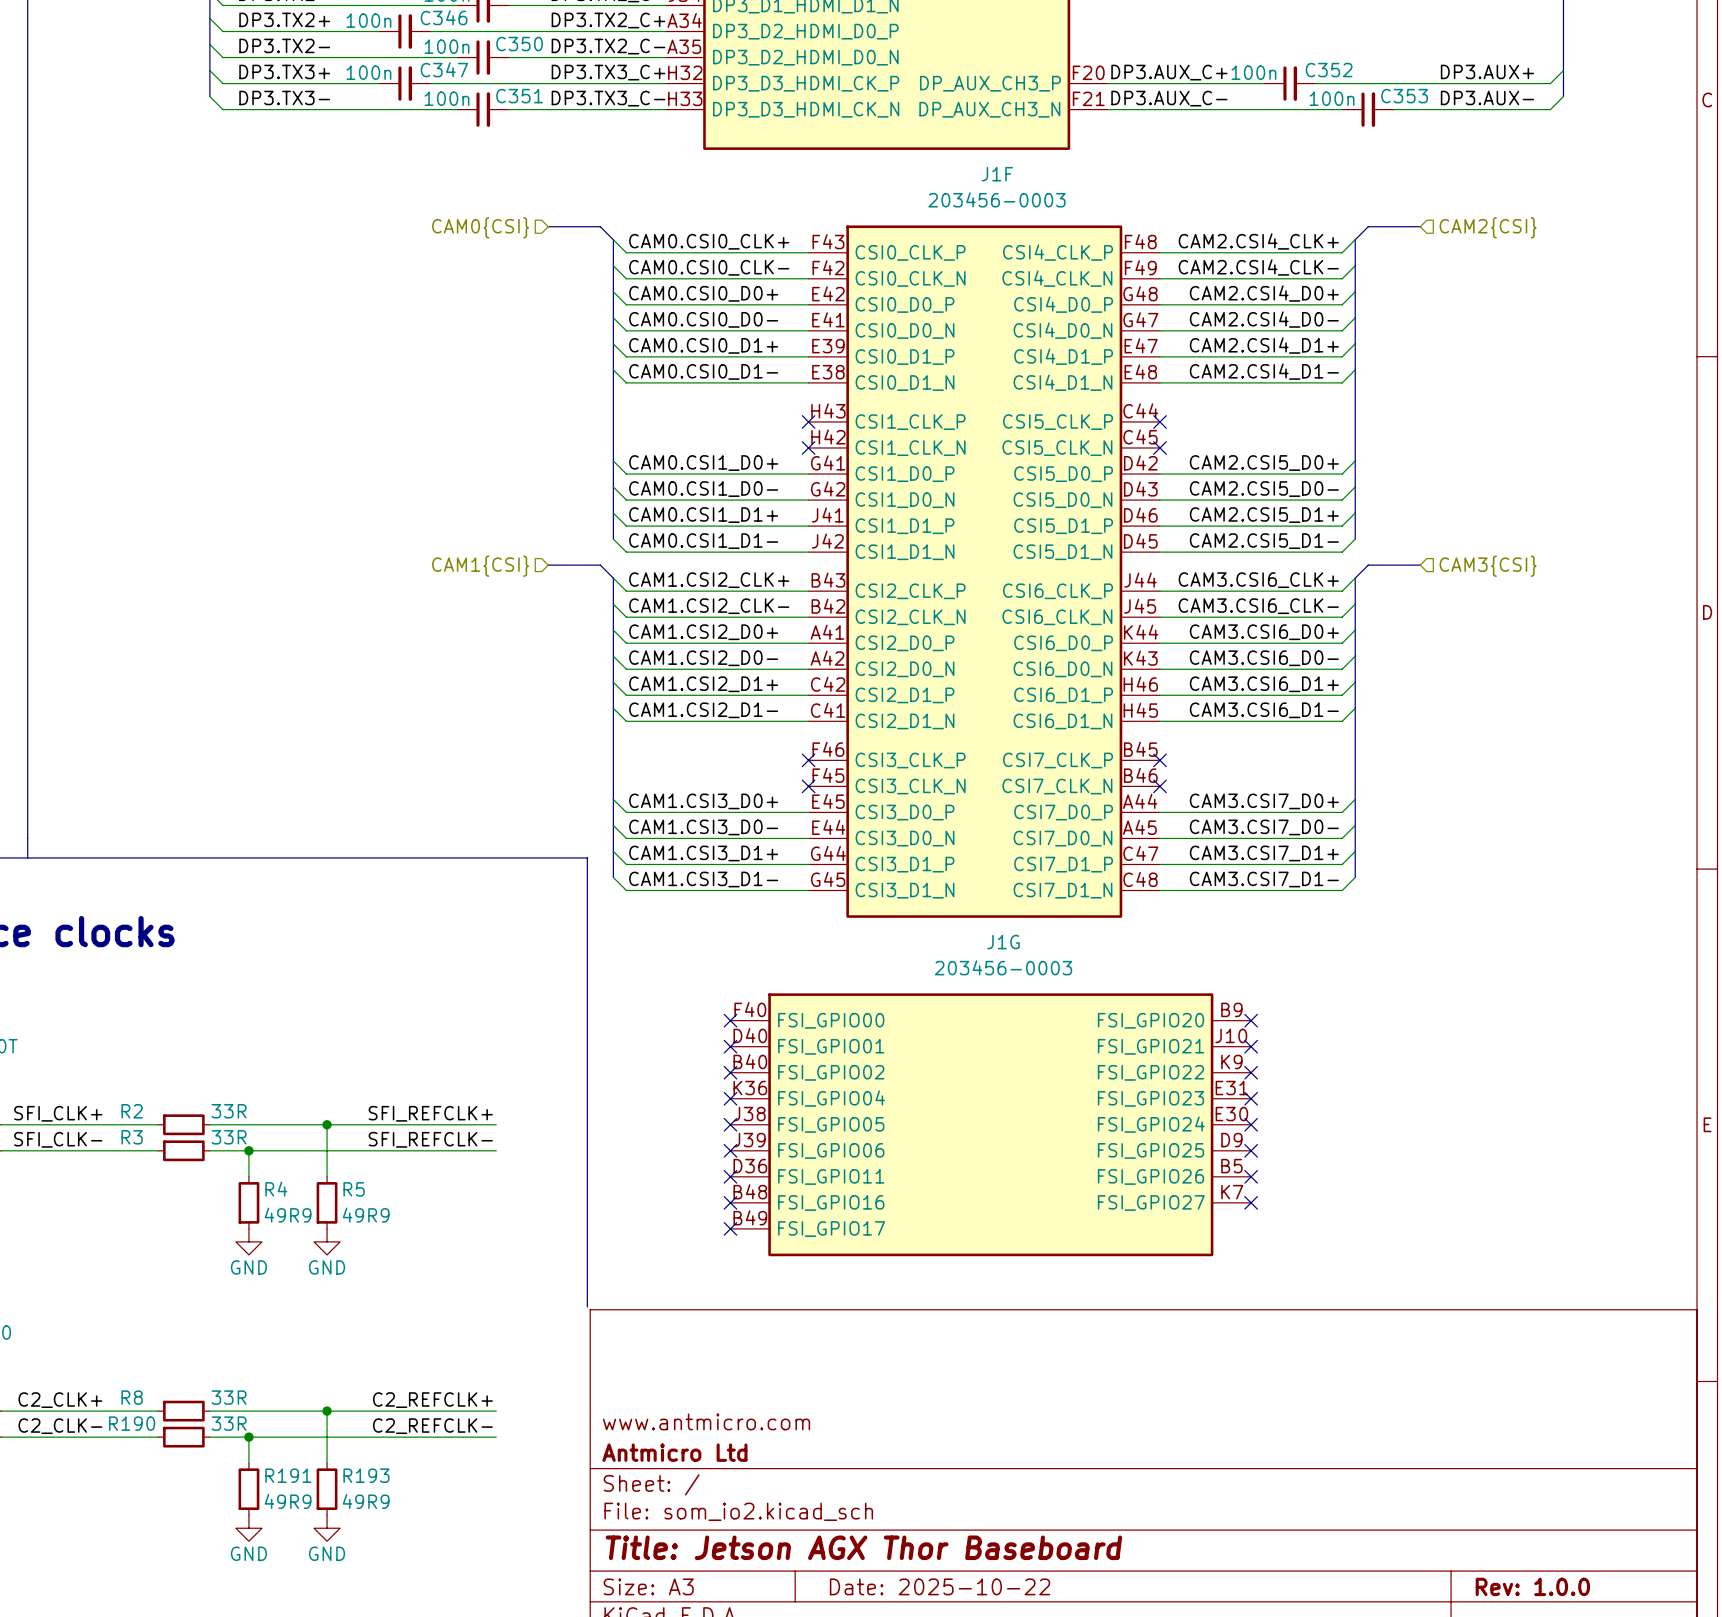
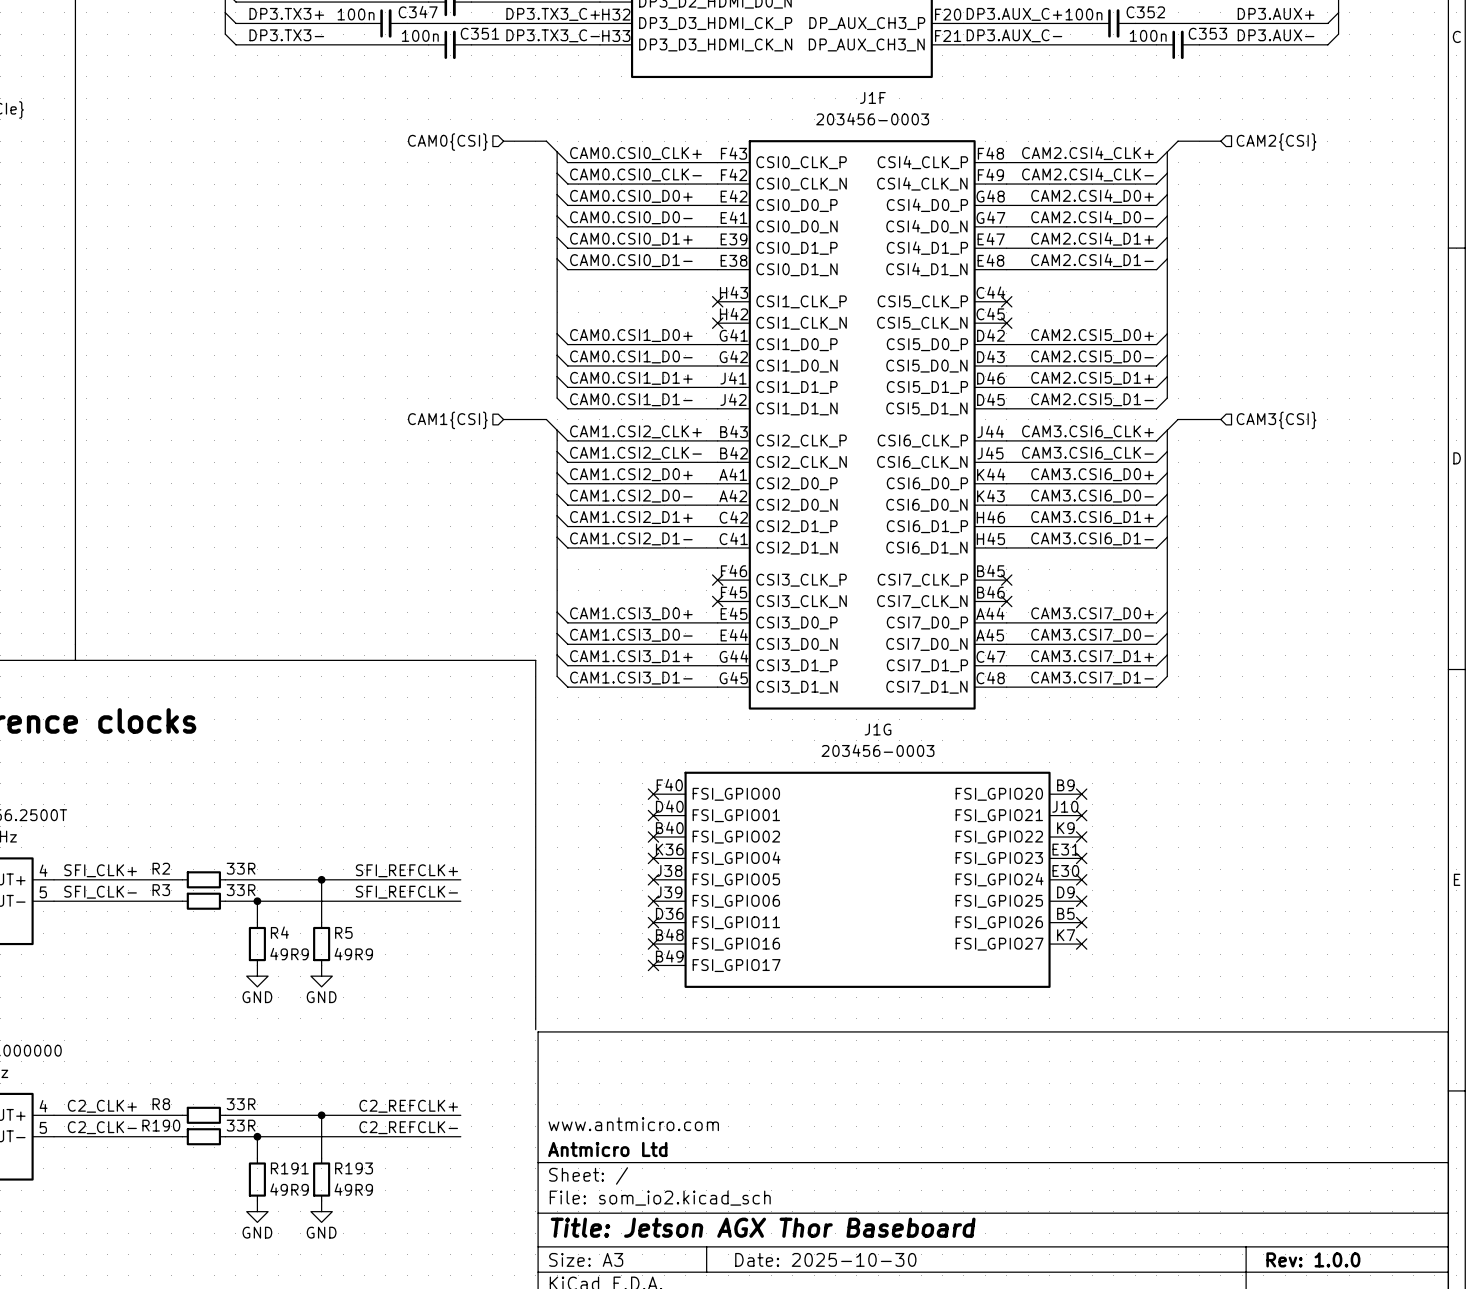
title block: Date: 2025-10-22 (940, 1586) -> Date: 2025-10-30 (825, 1259)

